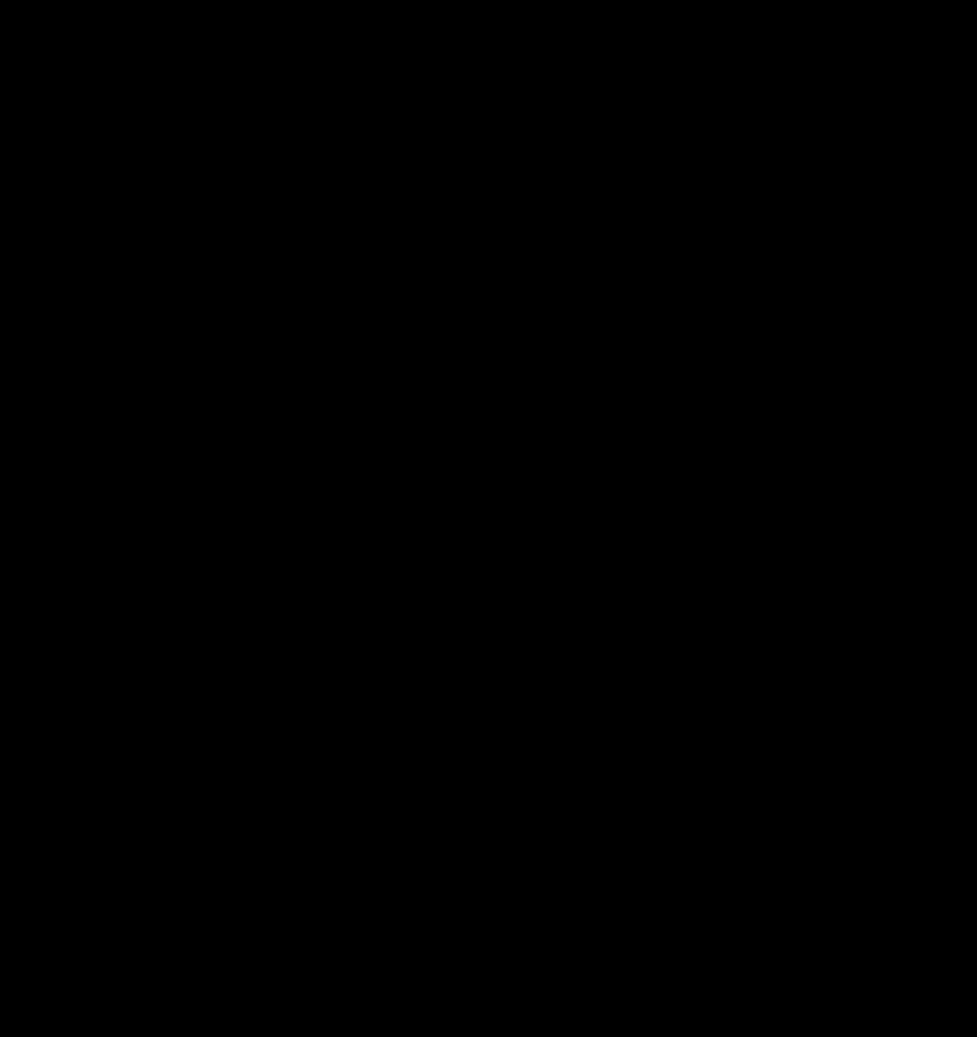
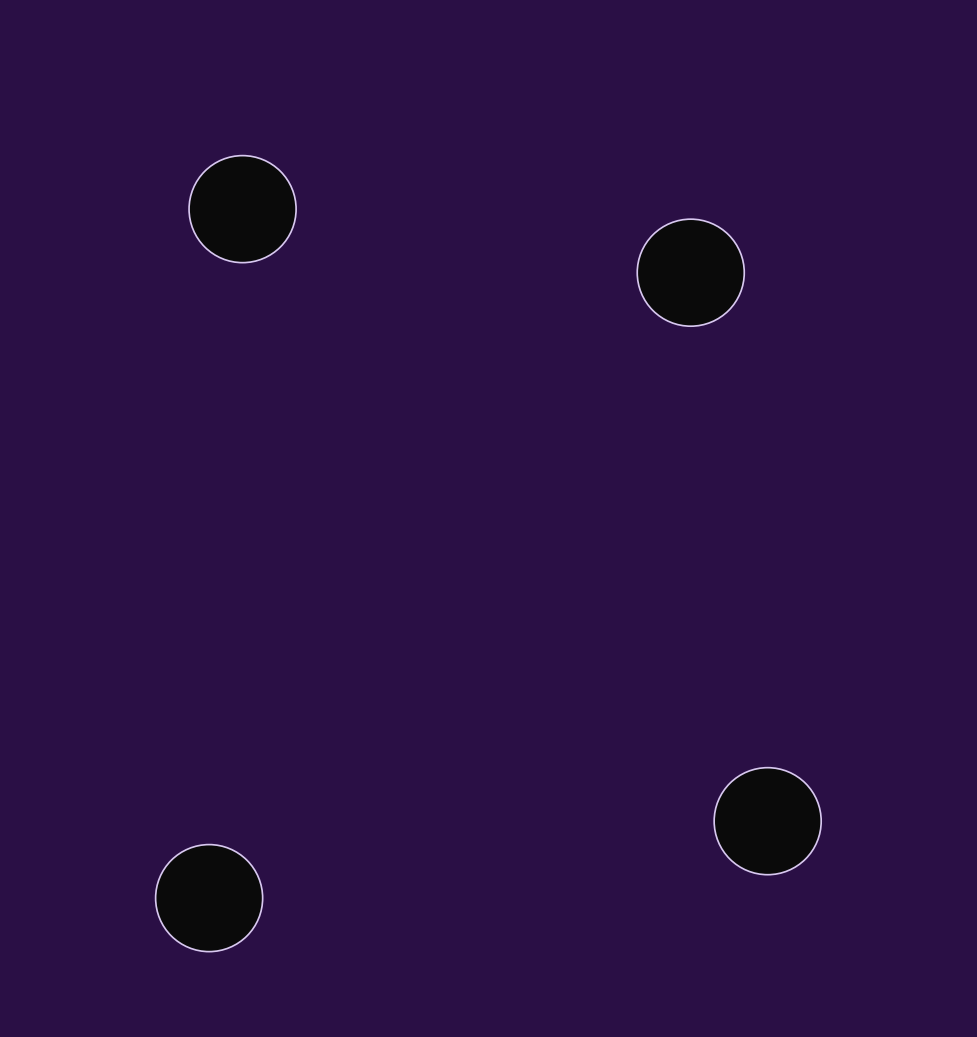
part: none -> (242, 209)
part: none -> (690, 272)
part: none -> (767, 821)
part: none -> (209, 898)

